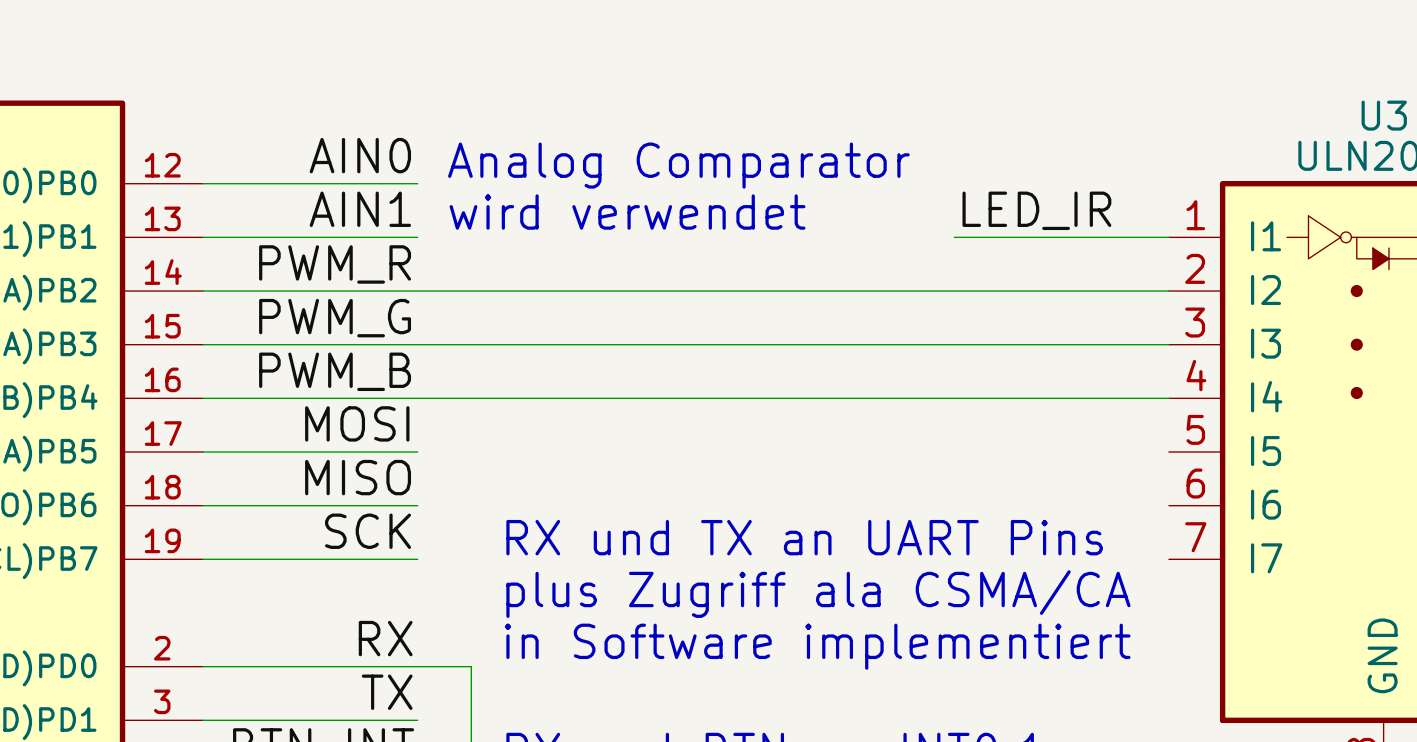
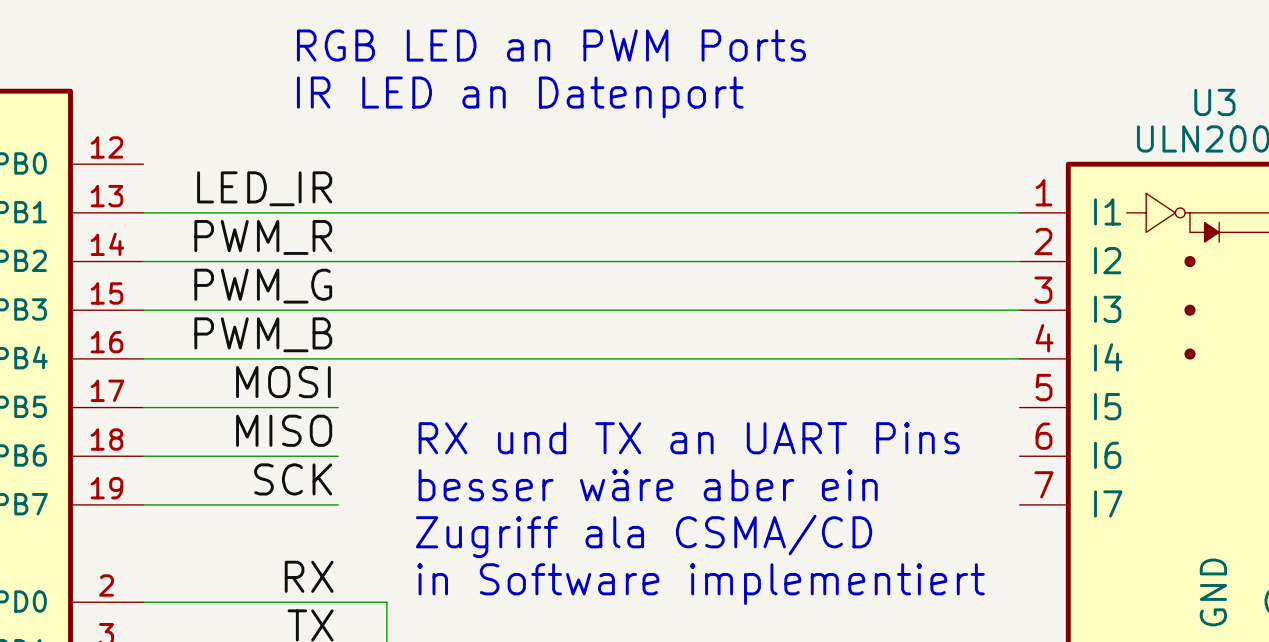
text: none -> RGB LED an PWM Ports (551, 45)
text: none -> IR LED an Datenport (520, 97)
label: AIN0 (360, 155) -> none
text: Analog Comparator (678, 165) -> none
wire: (203, 183) (417, 183) -> none
label: AIN1 (360, 209) -> LED_IR (264, 188)
label: LED_IR (1036, 210) -> none
text: wird verwendet (627, 212) -> none
wire: none -> (338, 212) (824, 212)
text: none -> RX und TX an UART Pins (689, 438)
text: RX und TX an UART Pins (804, 537) -> besser wäre aber ein (648, 485)
text: plus Zugriff ala CSMA/CA (818, 594) -> Zugriff ala CSMA/CD (643, 536)

